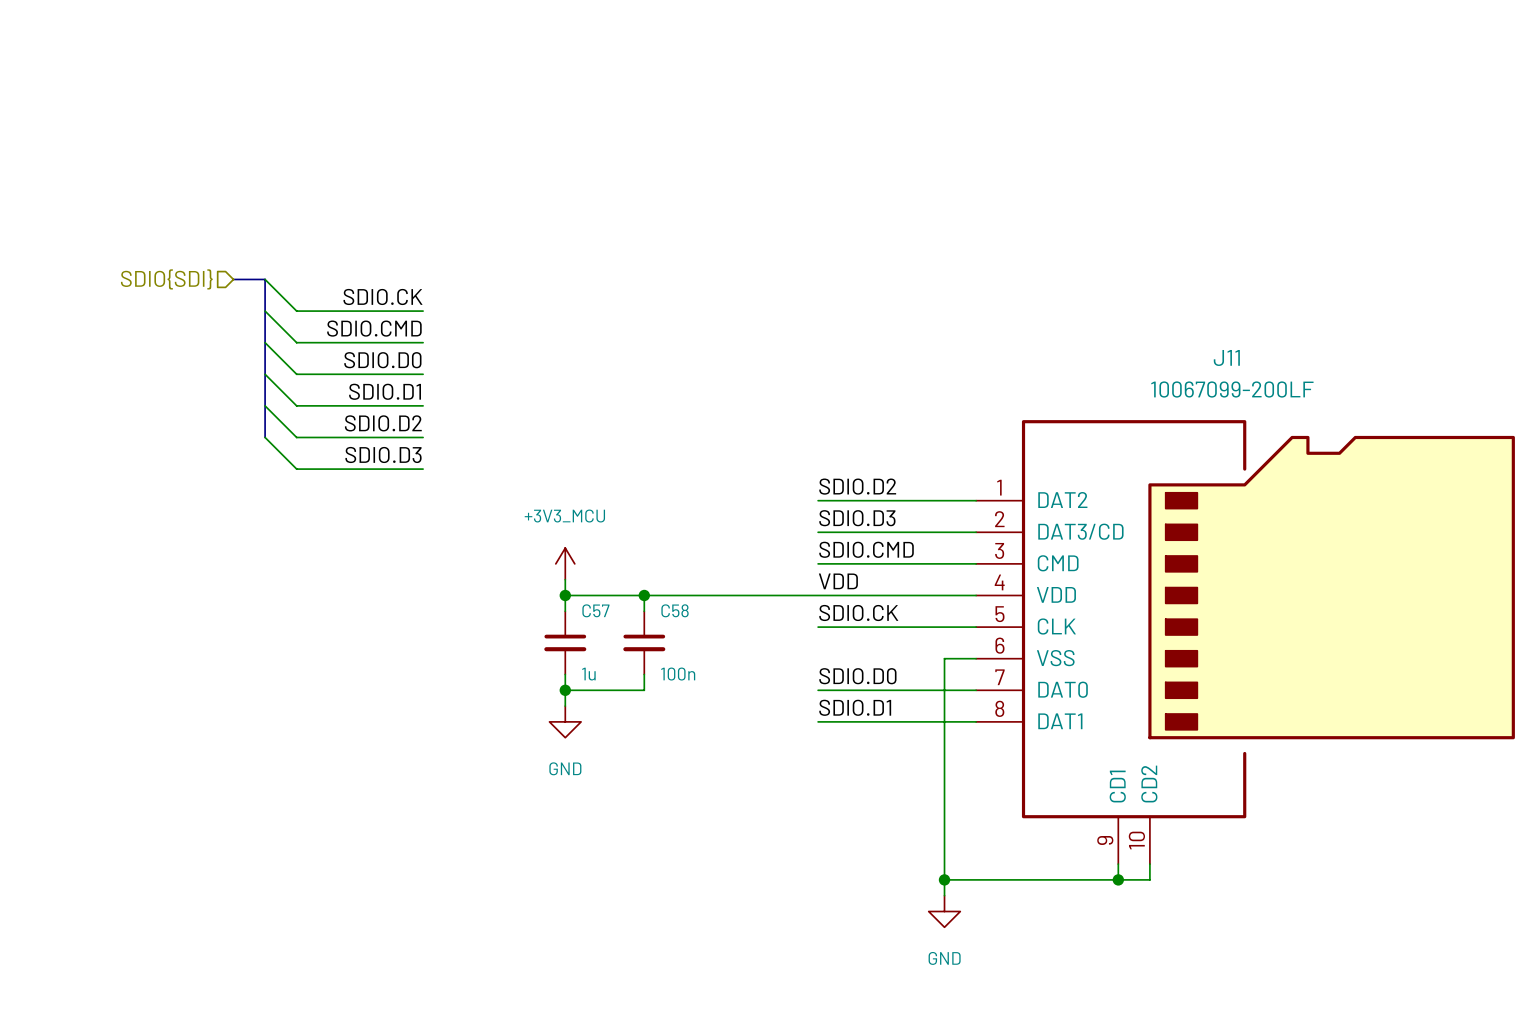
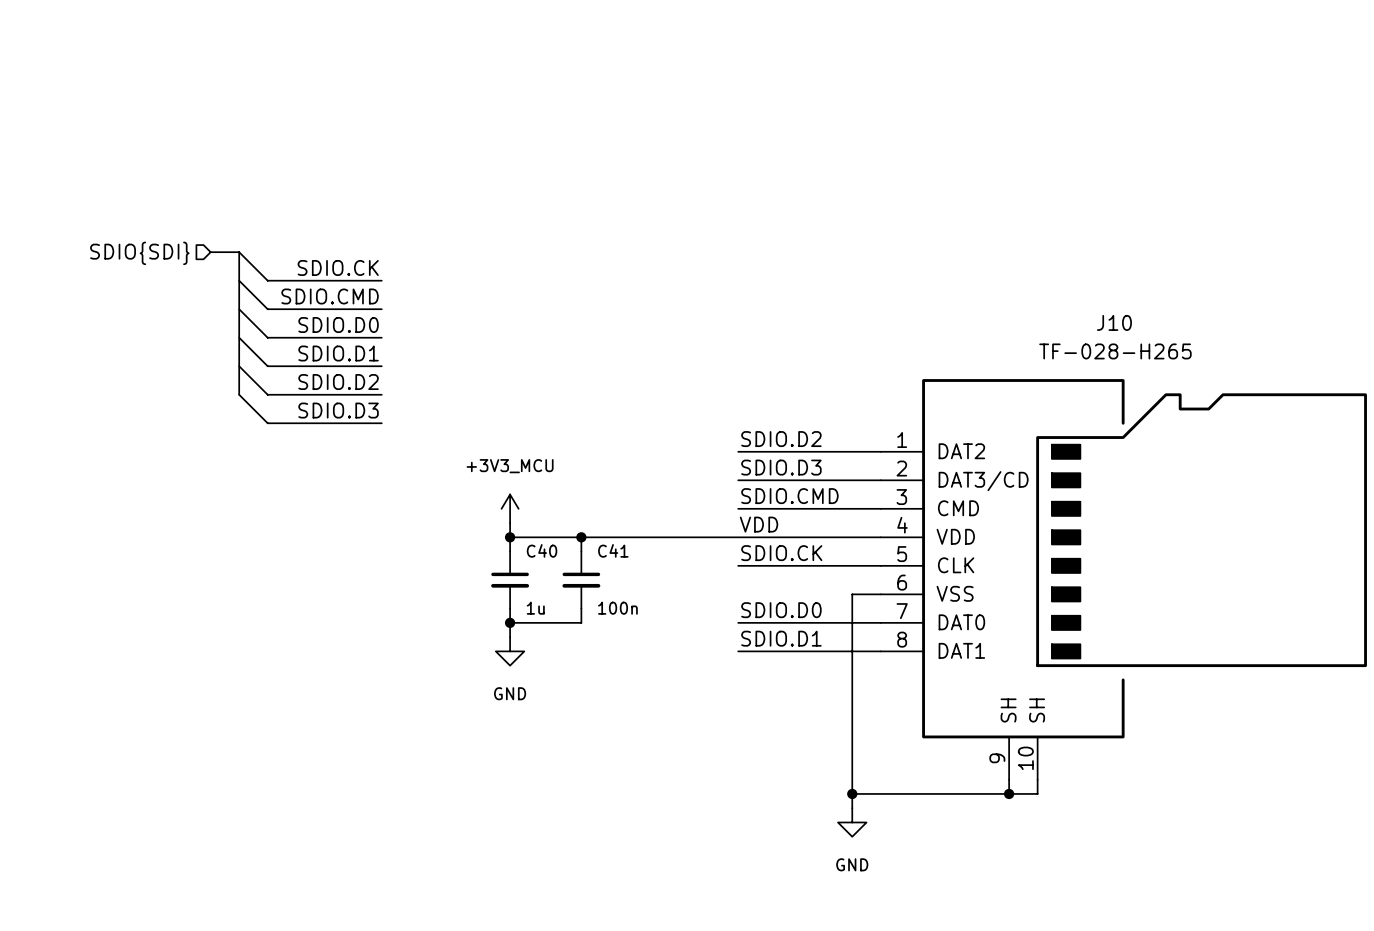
J11 name: J11 (1226, 357) -> J10 (1114, 322)
J11 value: 10067099-200LF (1232, 389) -> TF-028-H265 (1115, 351)
C57 name: C57 (595, 610) -> C40 (542, 550)
C58 name: C58 (675, 610) -> C41 (613, 550)
J11 pin name: CD2 (1149, 784) -> SH (1037, 710)
J11 pin name: CD1 (1117, 786) -> SH (1008, 710)

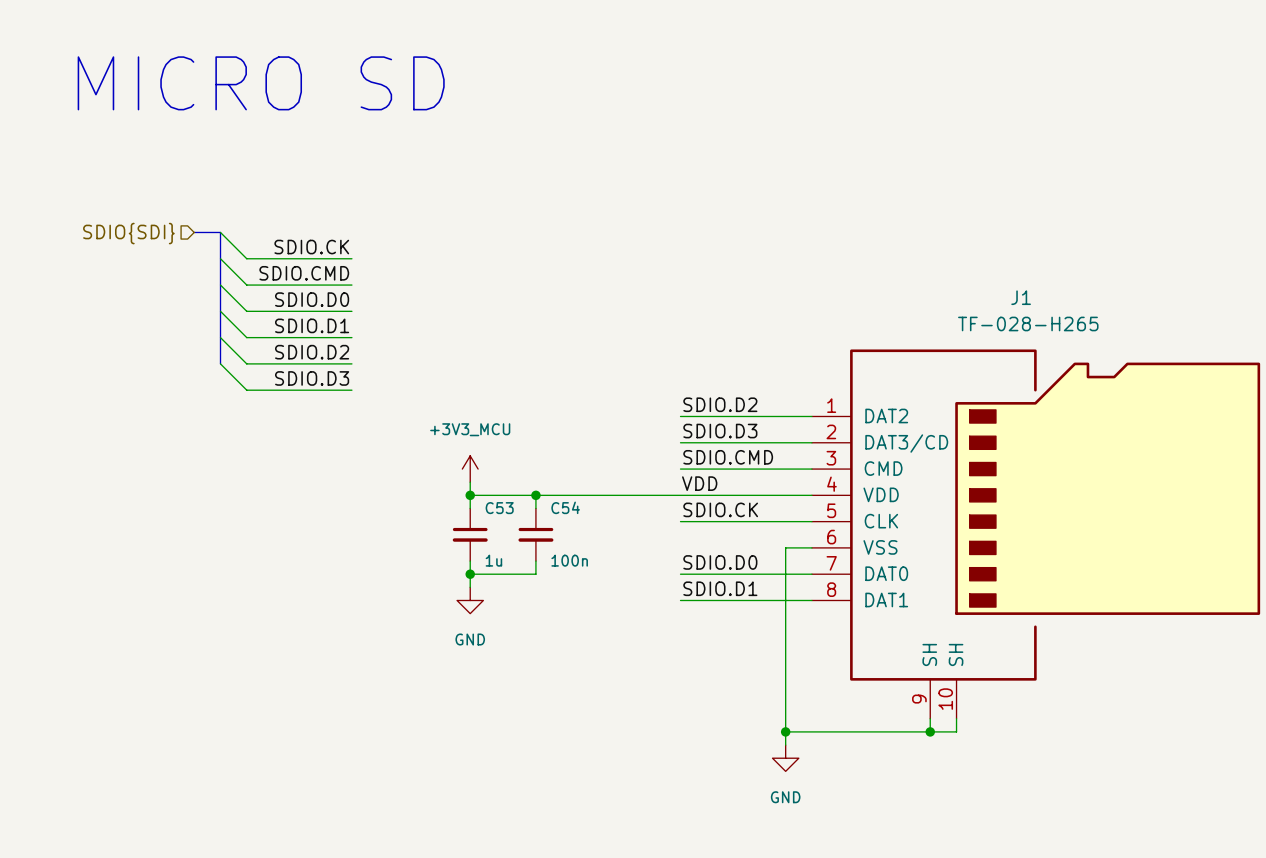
text: none -> MICRO SD (261, 83)
J10 name: J10 (1114, 322) -> J1 (1021, 297)
C40 name: C40 (542, 550) -> C53 (499, 508)
C41 name: C41 (613, 550) -> C54 (565, 507)

